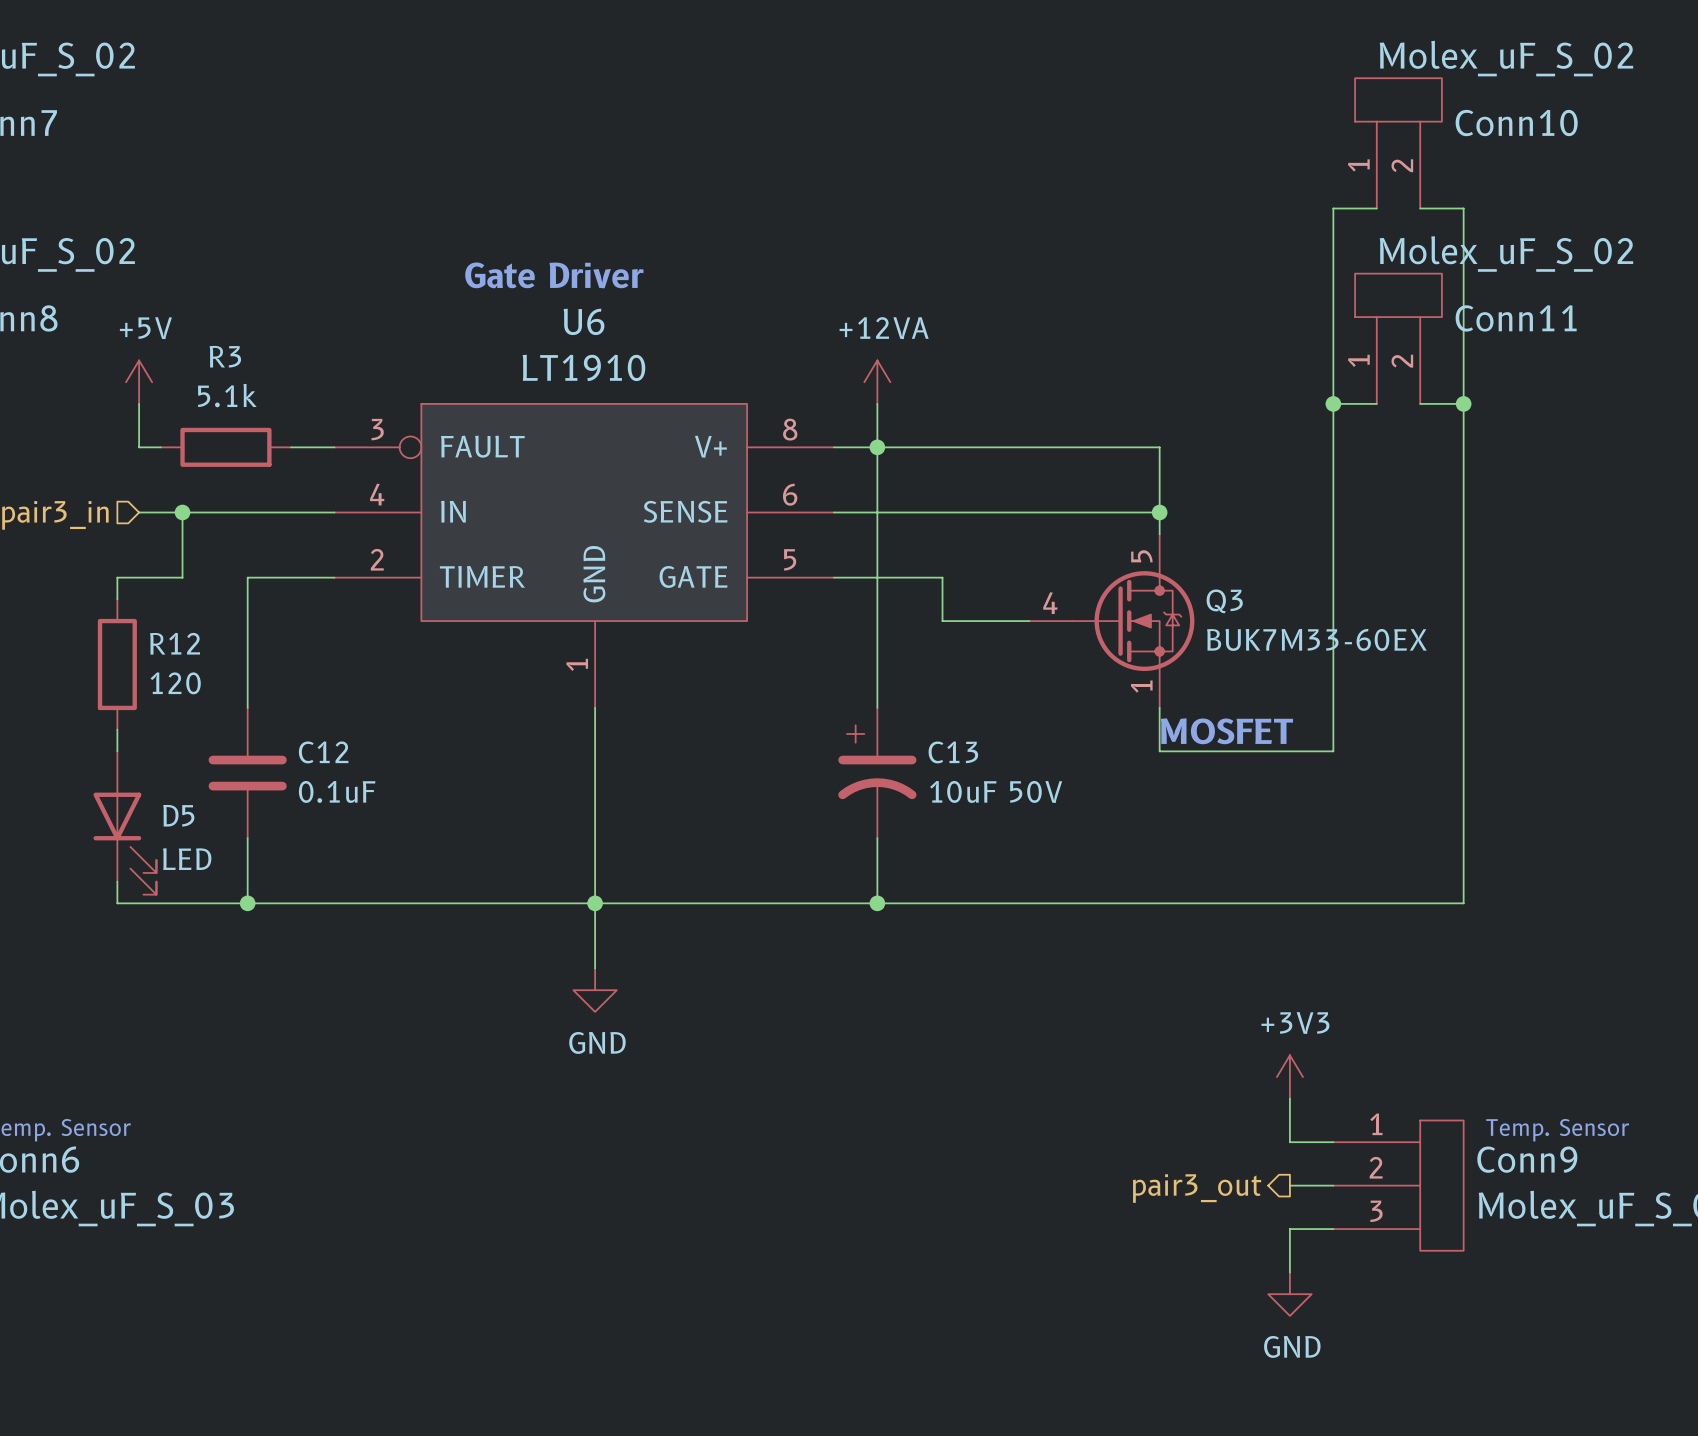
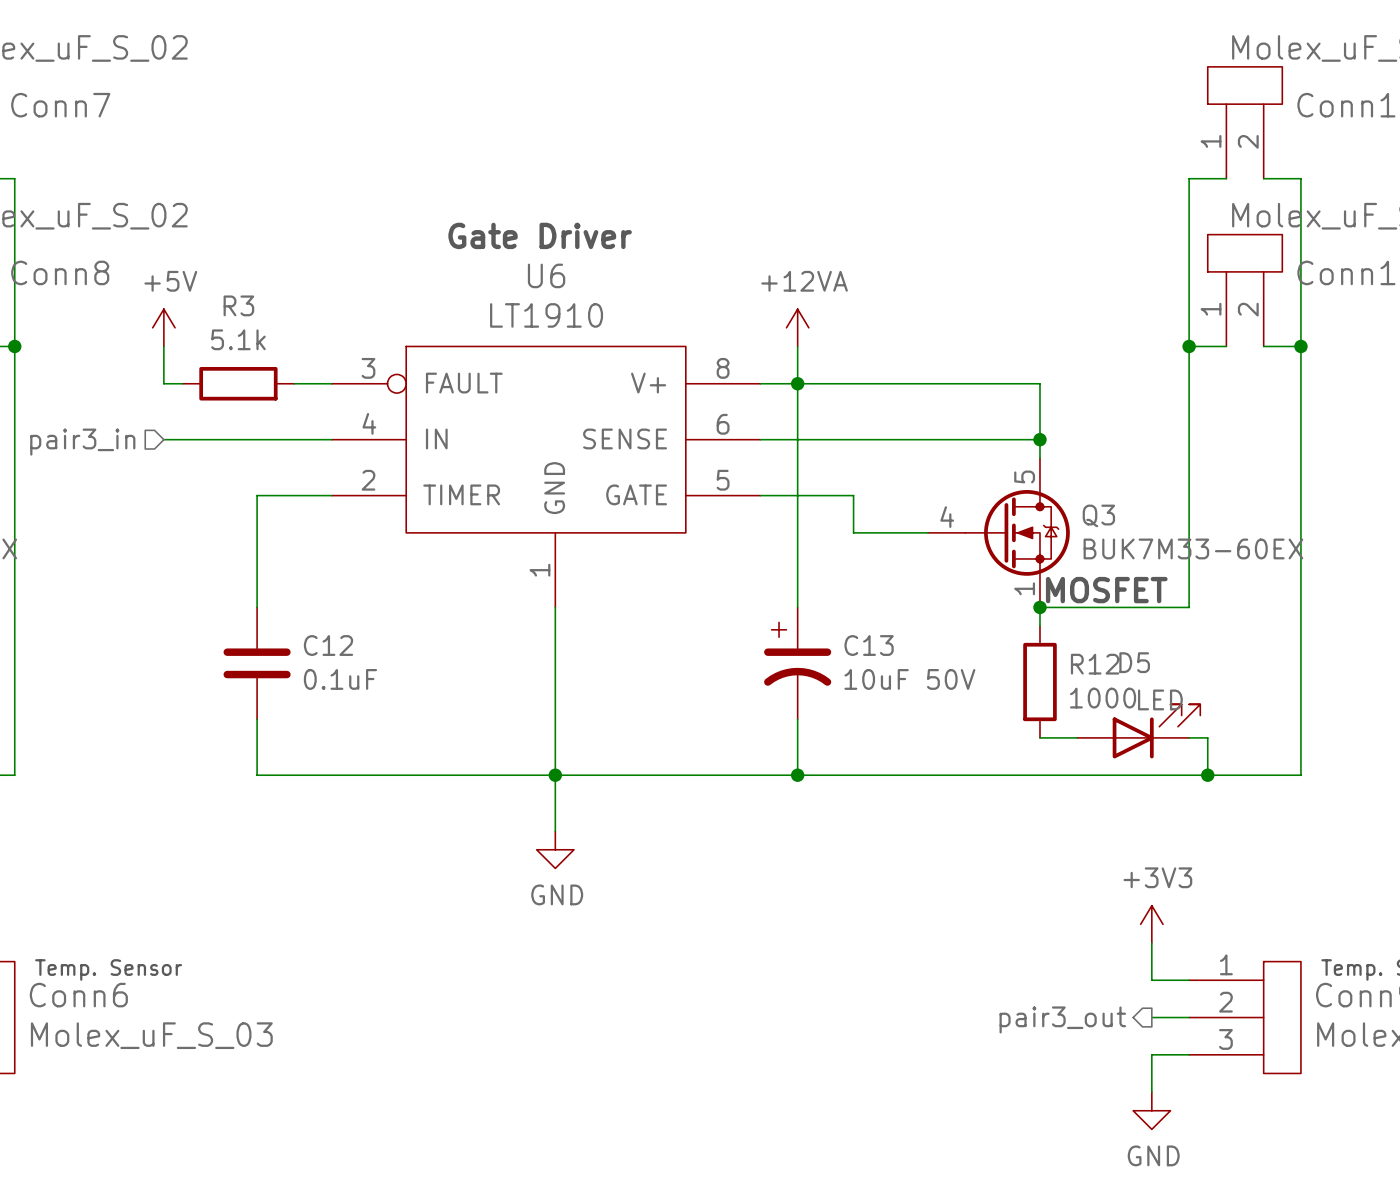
wire: (182, 512) (182, 577) (117, 577) (117, 599) -> none
junction: (182, 512) -> none
R12 position: (117, 664) -> (1039, 682)
R12 value: 120 (175, 683) -> 1000 (1103, 698)
junction: none -> (1039, 607)
wire: (1333, 707) (1333, 751) (1159, 751) (1159, 729) -> (1189, 607) (1039, 607)
wire: (117, 729) (117, 751) -> none
text position: MOSFET (1226, 731) -> MOSFET (1106, 590)
D5 position: (124, 823) -> (1138, 731)
D5 rotation: 0° (124, 843) -> 90° counterclockwise (1156, 731)
D5 value position: LED (187, 859) -> LED (1160, 699)
wire: none -> (1039, 737) (1077, 737)
wire: none -> (1189, 737) (1207, 737) (1207, 775)
wire: (117, 881) (117, 903) (247, 903) -> none
junction: (247, 903) -> none
junction: none -> (1207, 775)

